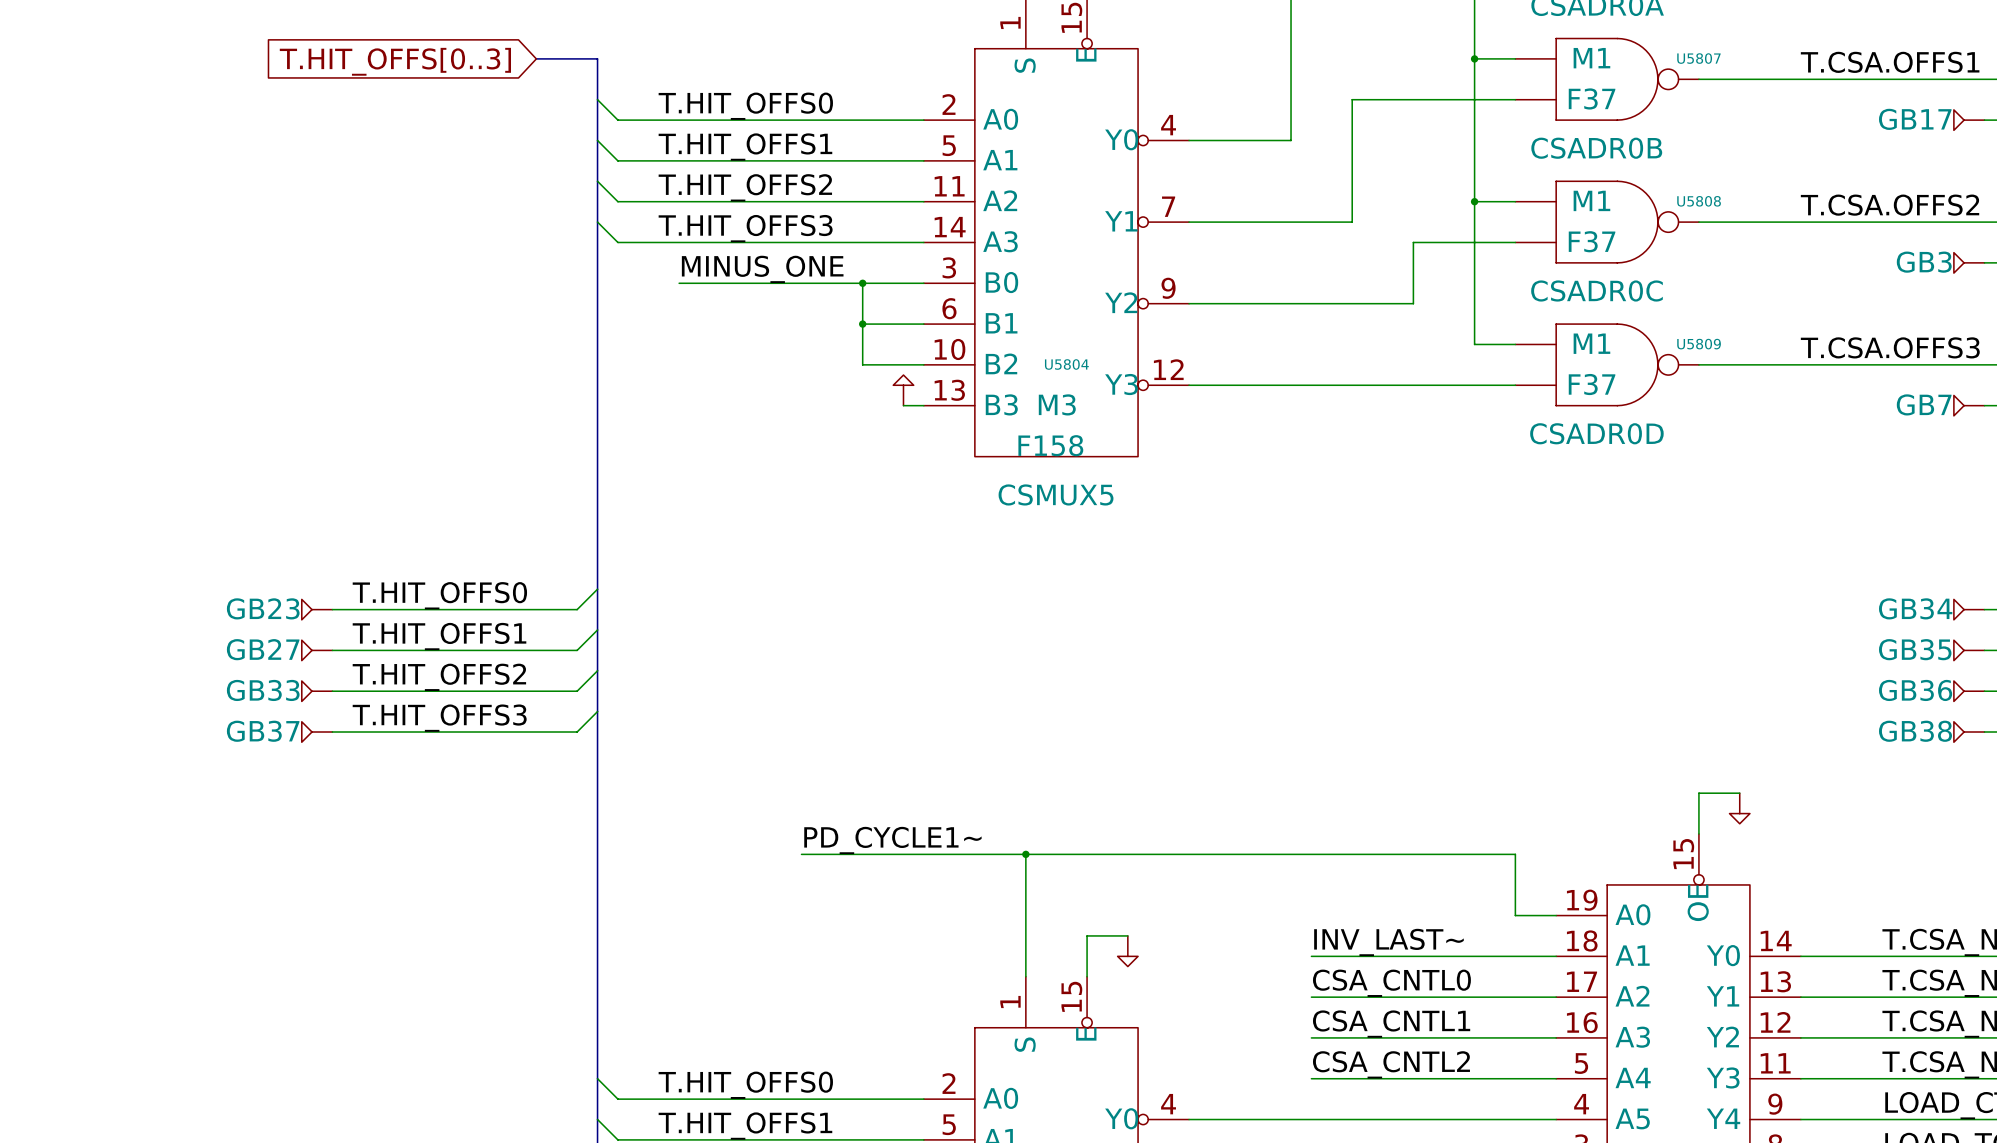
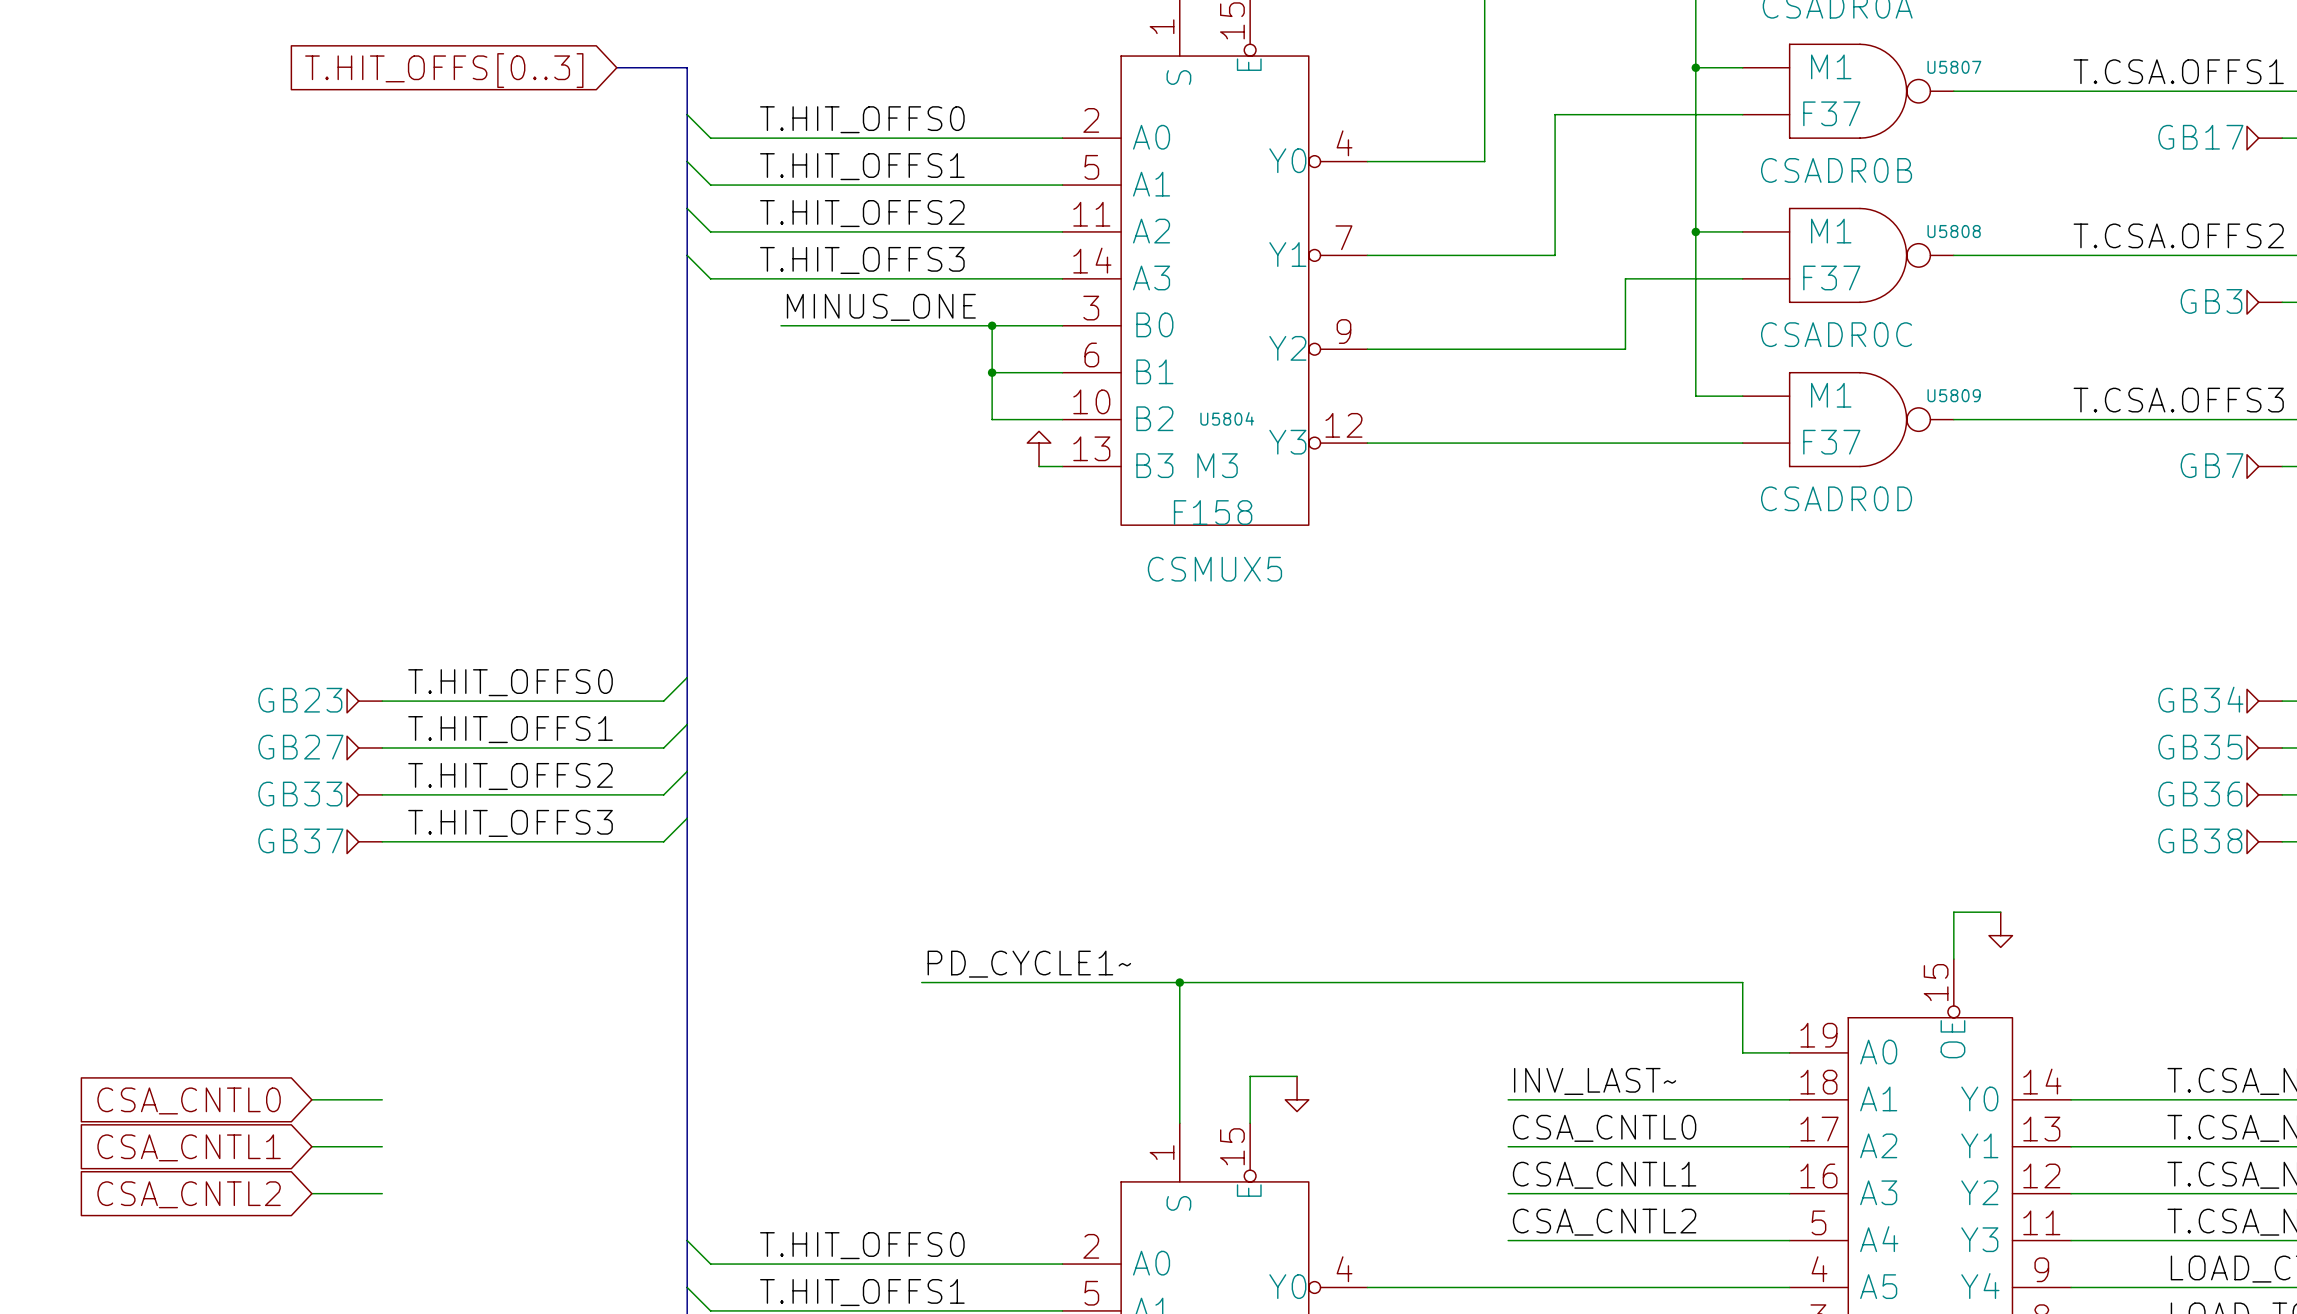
wire: none -> (311, 1099) (382, 1099)
global label: none -> CSA_CNTL0 (189, 1100)
wire: none -> (311, 1146) (382, 1146)
global label: none -> CSA_CNTL1 (189, 1147)
wire: none -> (311, 1193) (382, 1193)
global label: none -> CSA_CNTL2 (189, 1194)

